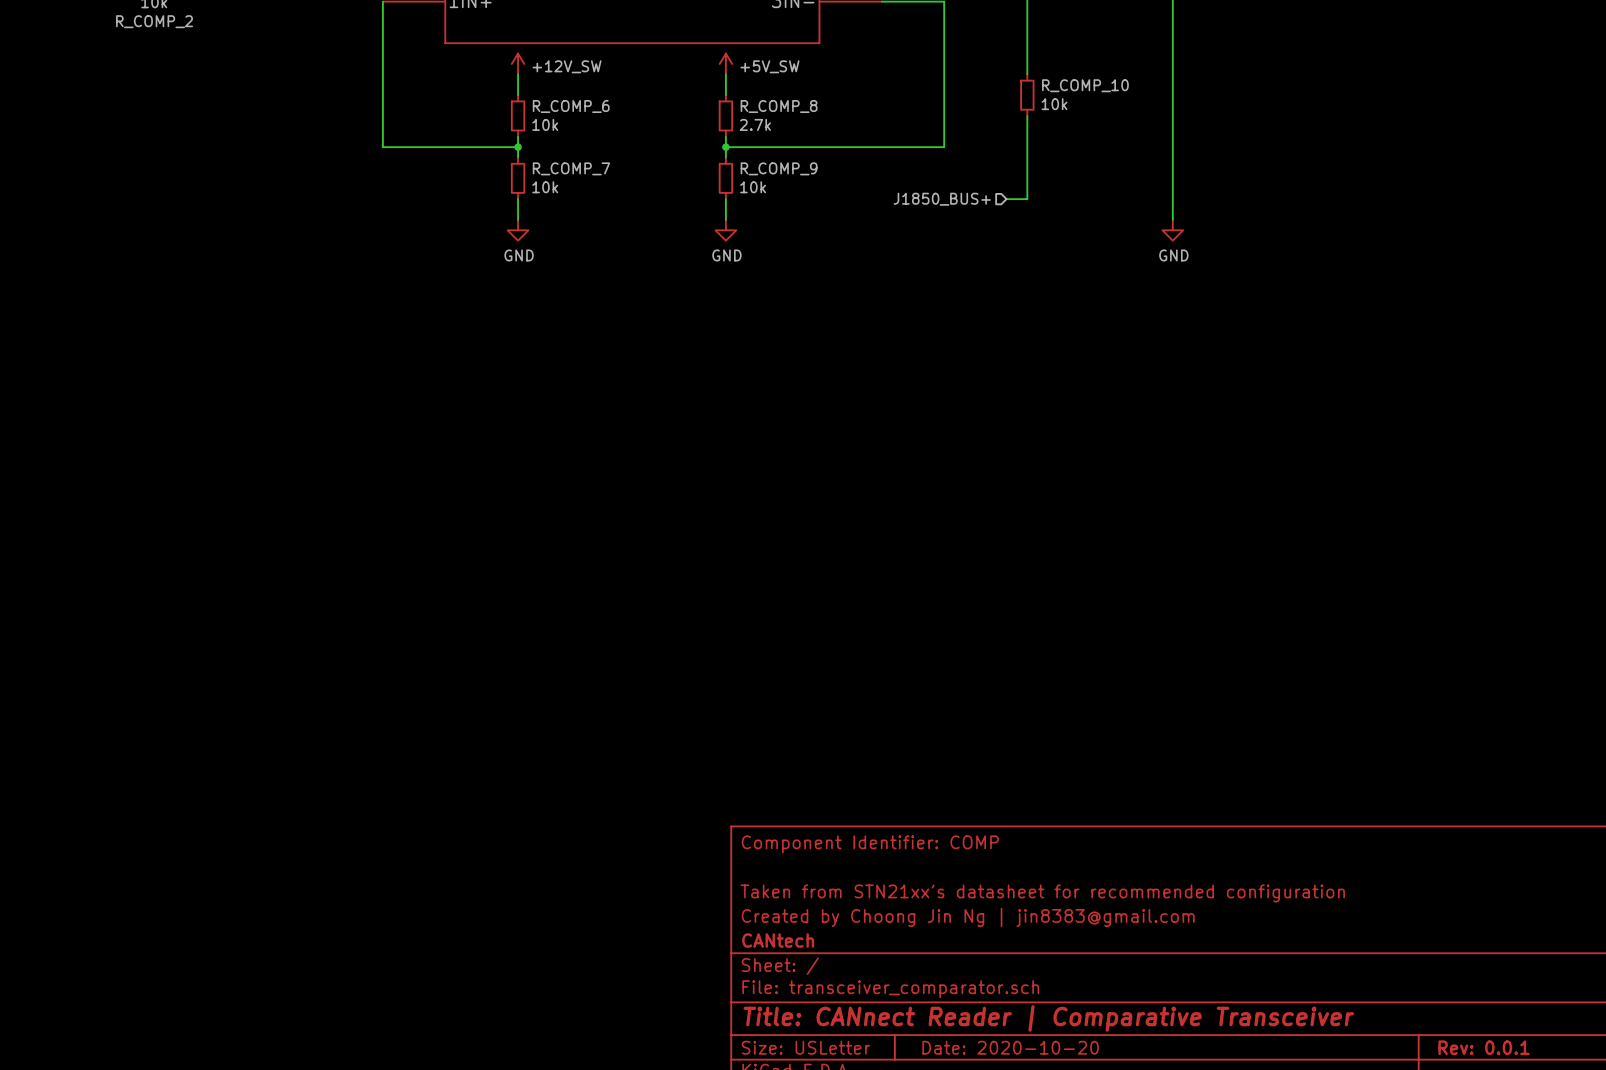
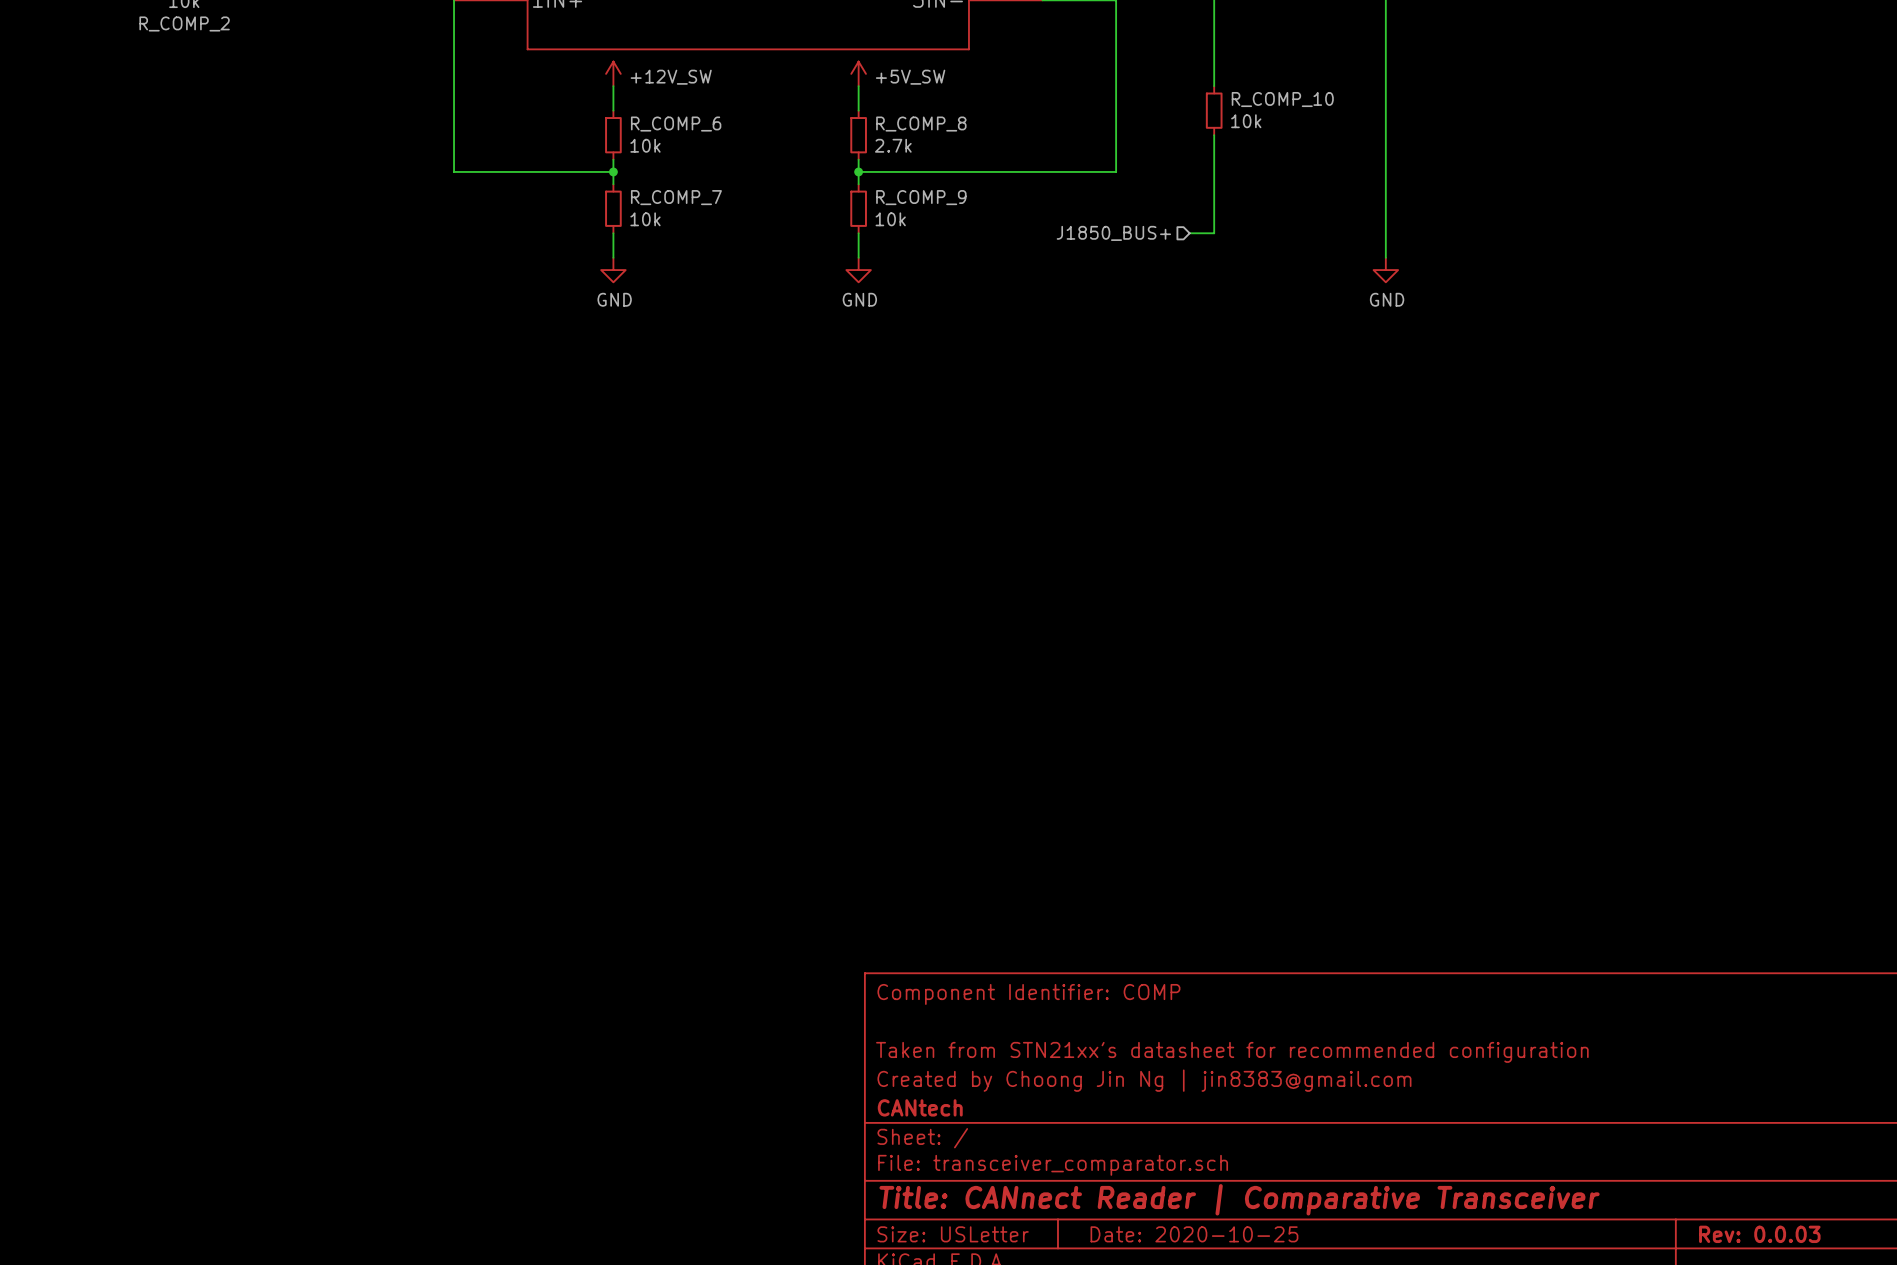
title block: Date: 2020-10-20 (1010, 1047) -> Date: 2020-10-25 (1194, 1234)
title block: Rev: 0.0.1 (1484, 1047) -> Rev: 0.0.03 (1759, 1234)

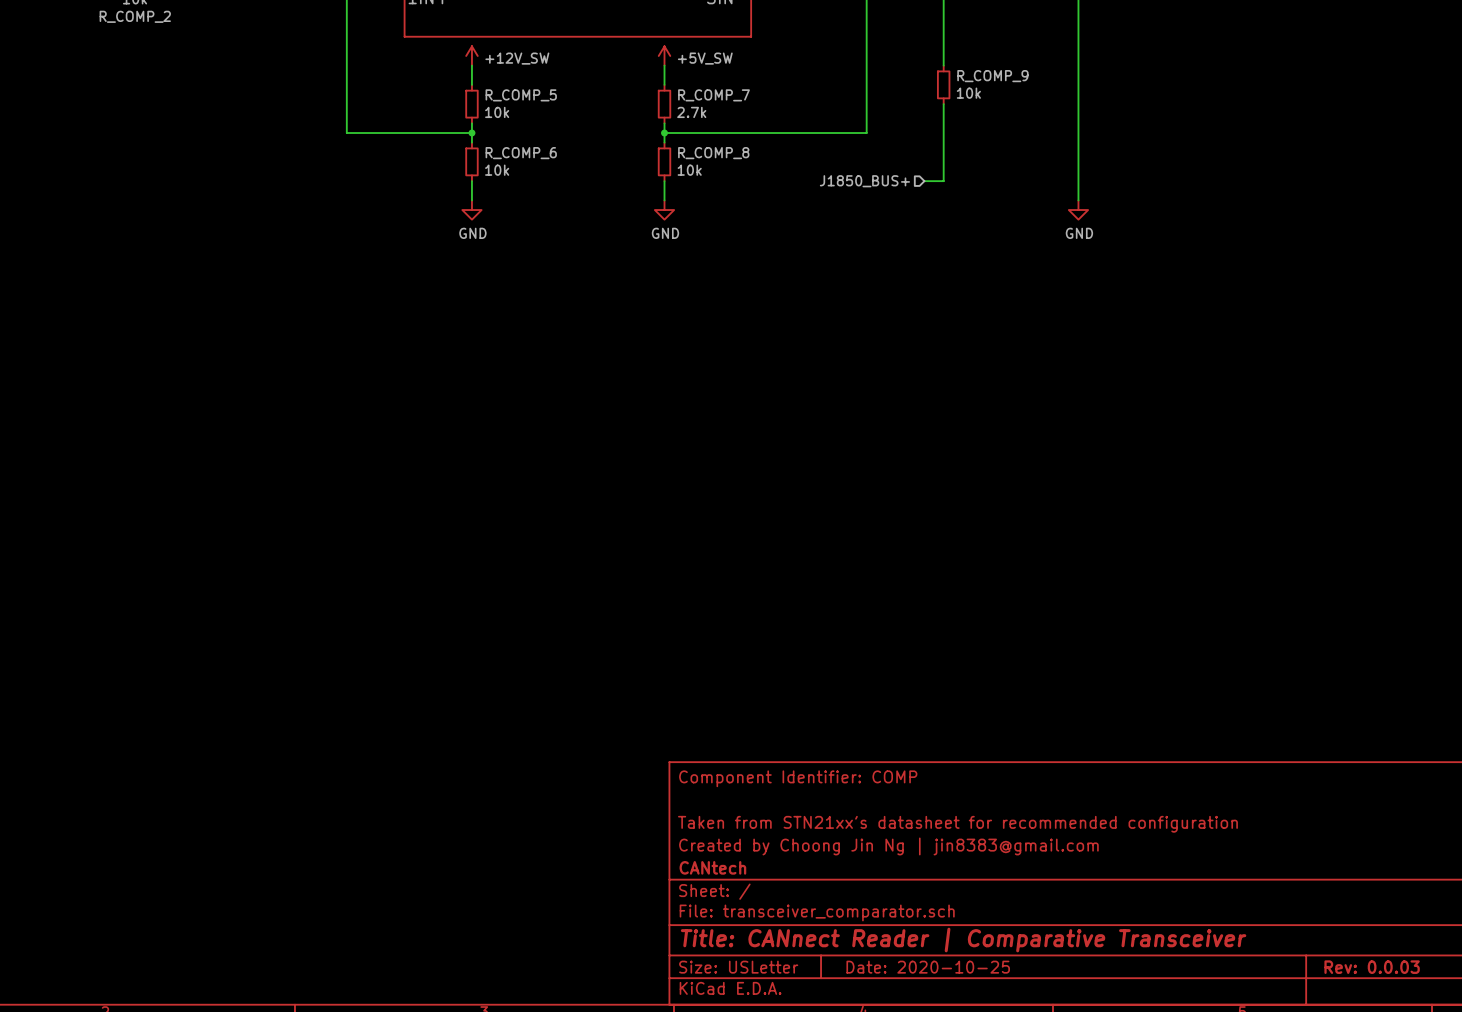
R_COMP_10 name: R_COMP_10 (1282, 99) -> R_COMP_9 (992, 76)
R_COMP_6 name: R_COMP_6 (676, 124) -> R_COMP_5 (521, 95)
R_COMP_8 name: R_COMP_8 (921, 124) -> R_COMP_7 (713, 95)
R_COMP_7 name: R_COMP_7 (676, 197) -> R_COMP_6 (521, 153)
R_COMP_9 name: R_COMP_9 (921, 197) -> R_COMP_8 (713, 153)

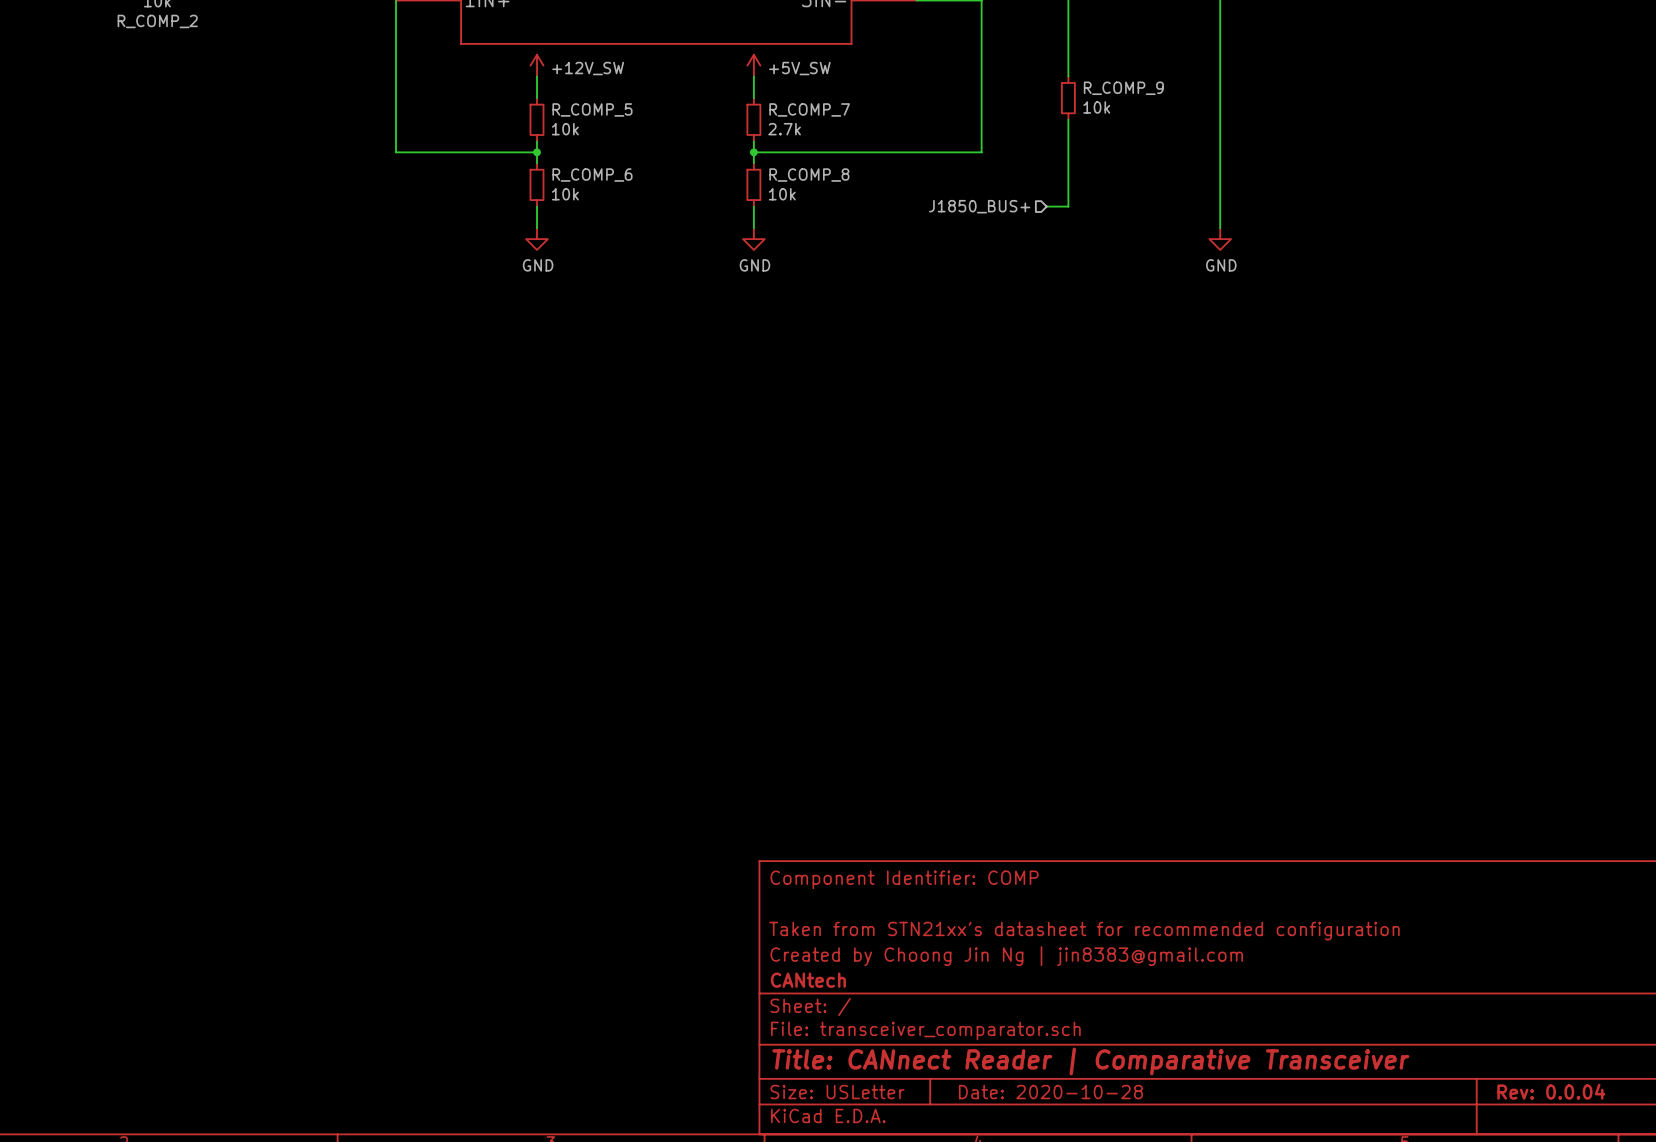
title block: Date: 2020-10-25 (928, 967) -> Date: 2020-10-28 (1050, 1092)
title block: Rev: 0.0.03 (1372, 967) -> Rev: 0.0.04 (1551, 1091)

